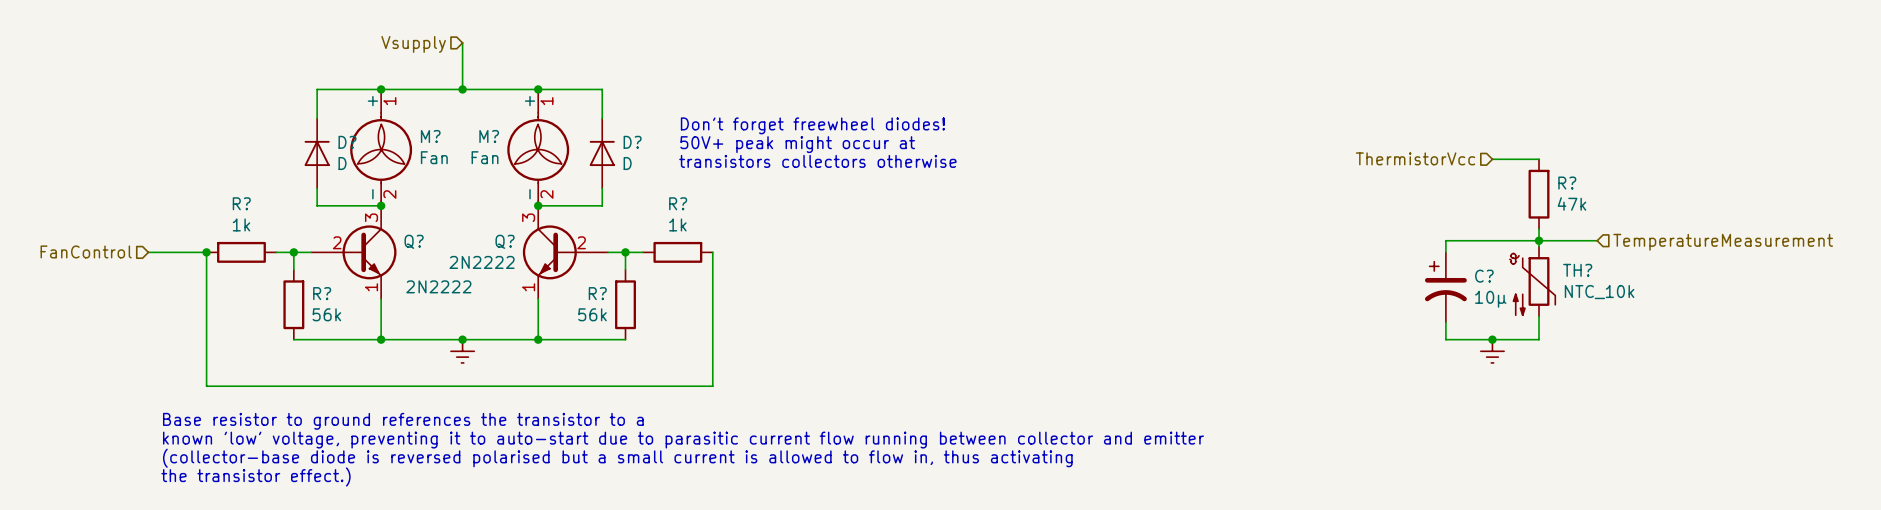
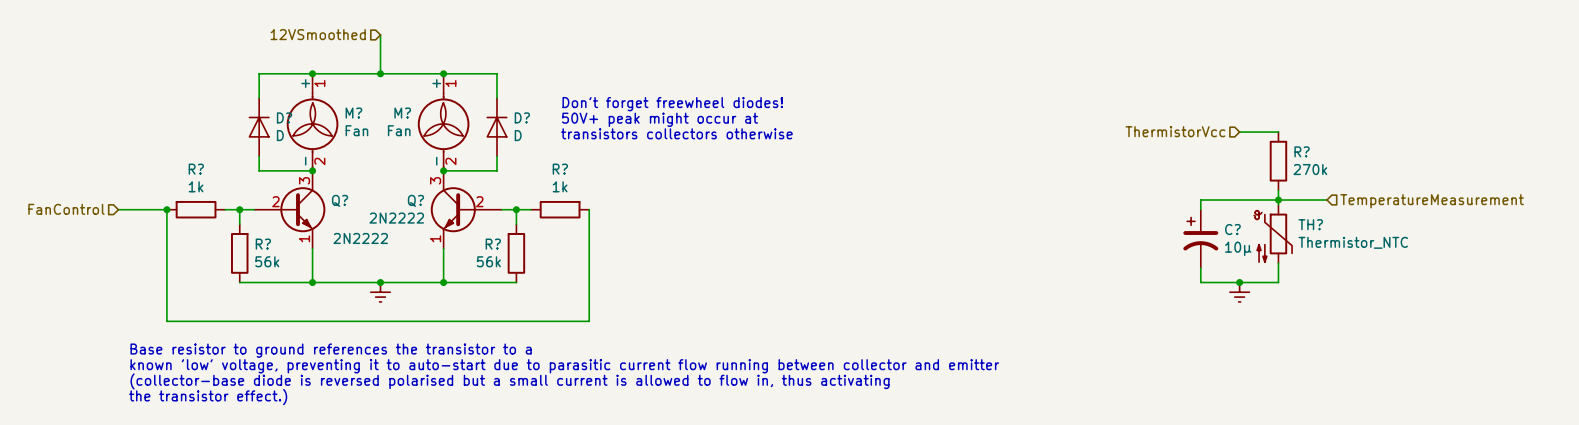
hierarchical label: Vsupply (413, 44) -> 12VSmoothed (318, 34)
R? value: 47k (1572, 203) -> 270k (1310, 169)
TH? value: NTC_10k (1599, 292) -> Thermistor_NTC (1353, 242)

